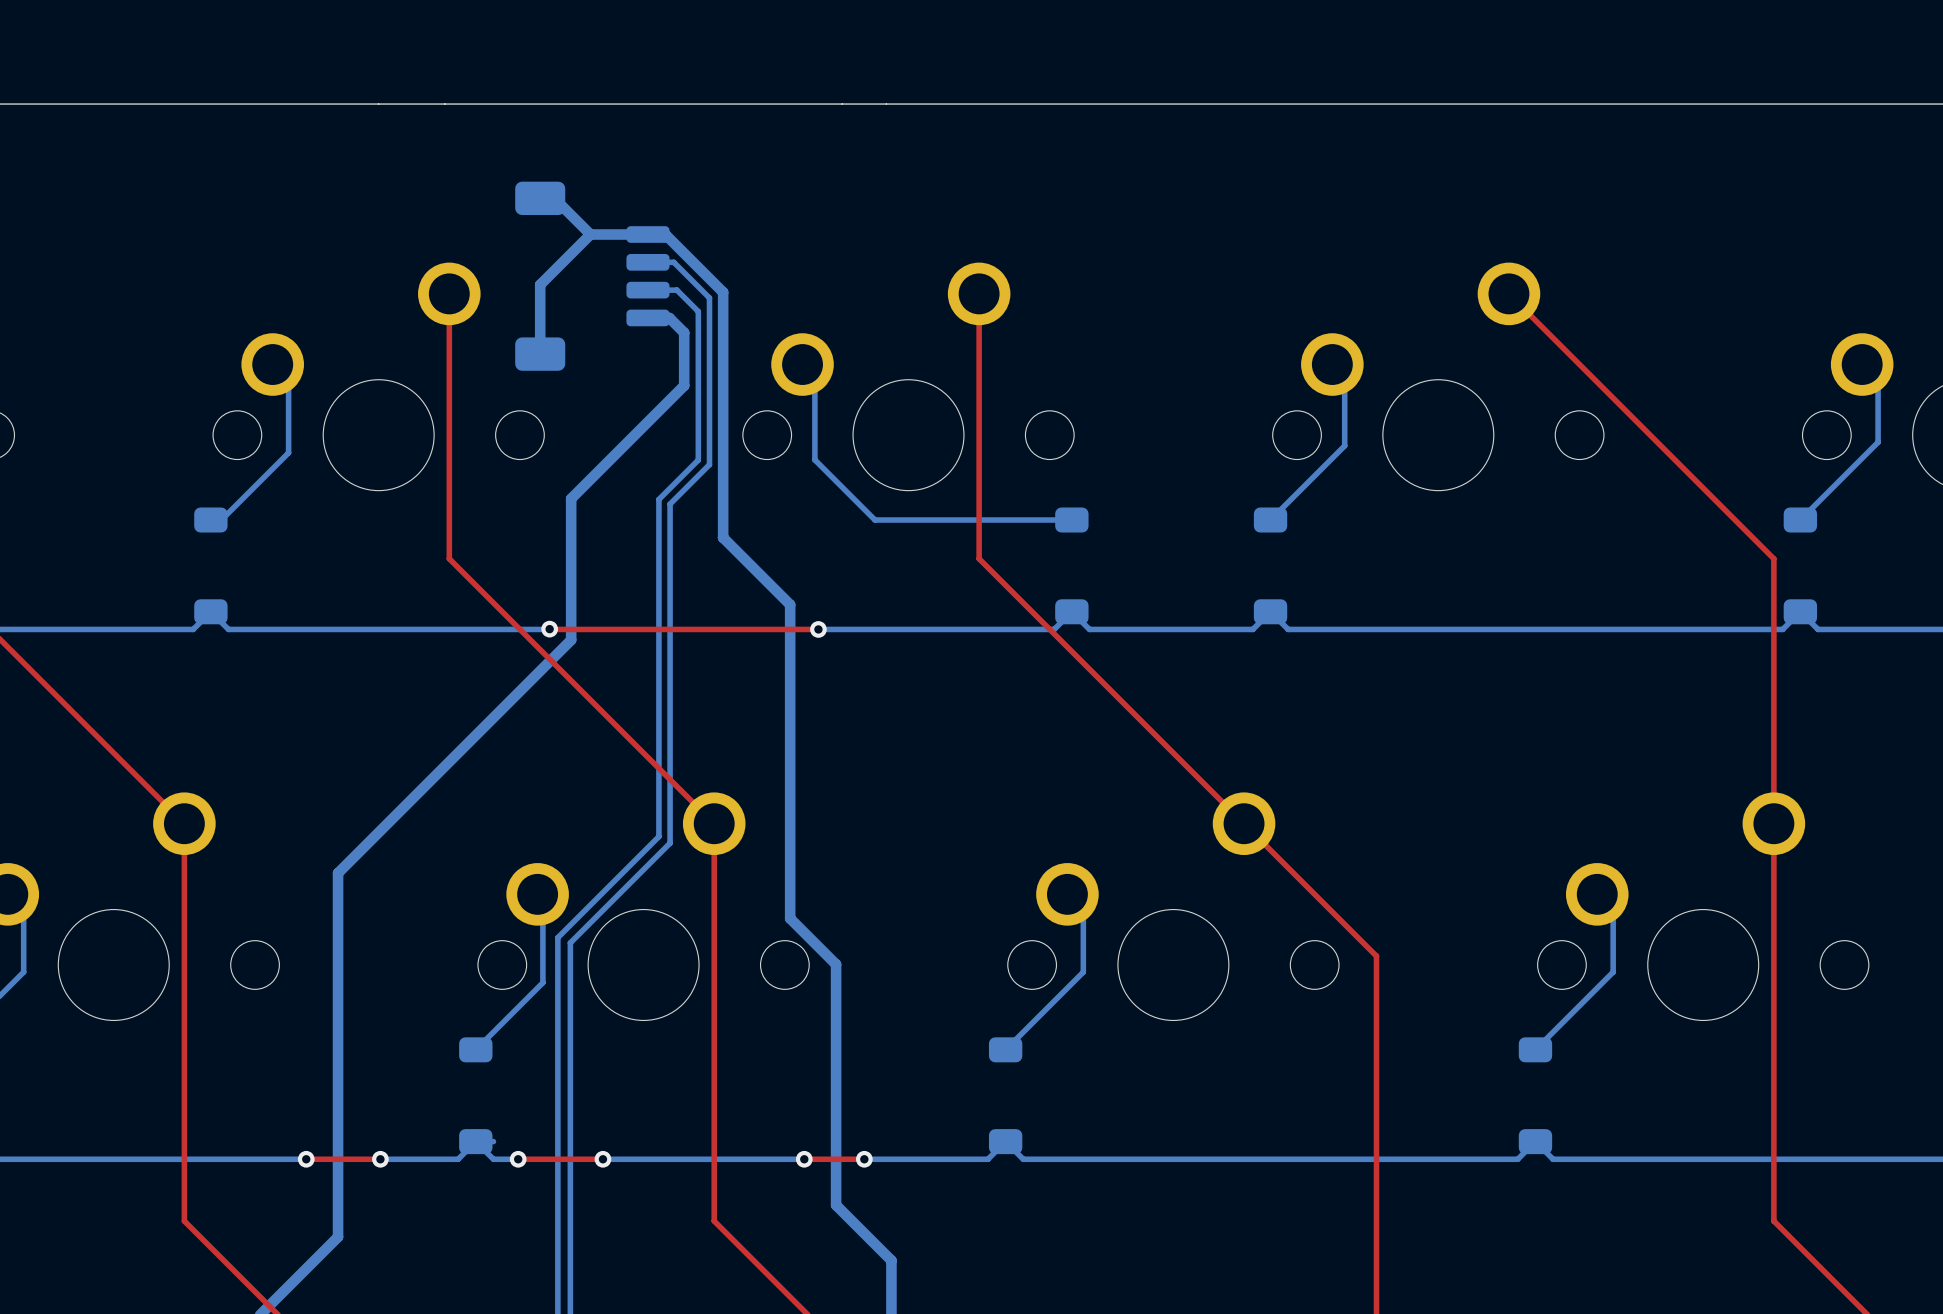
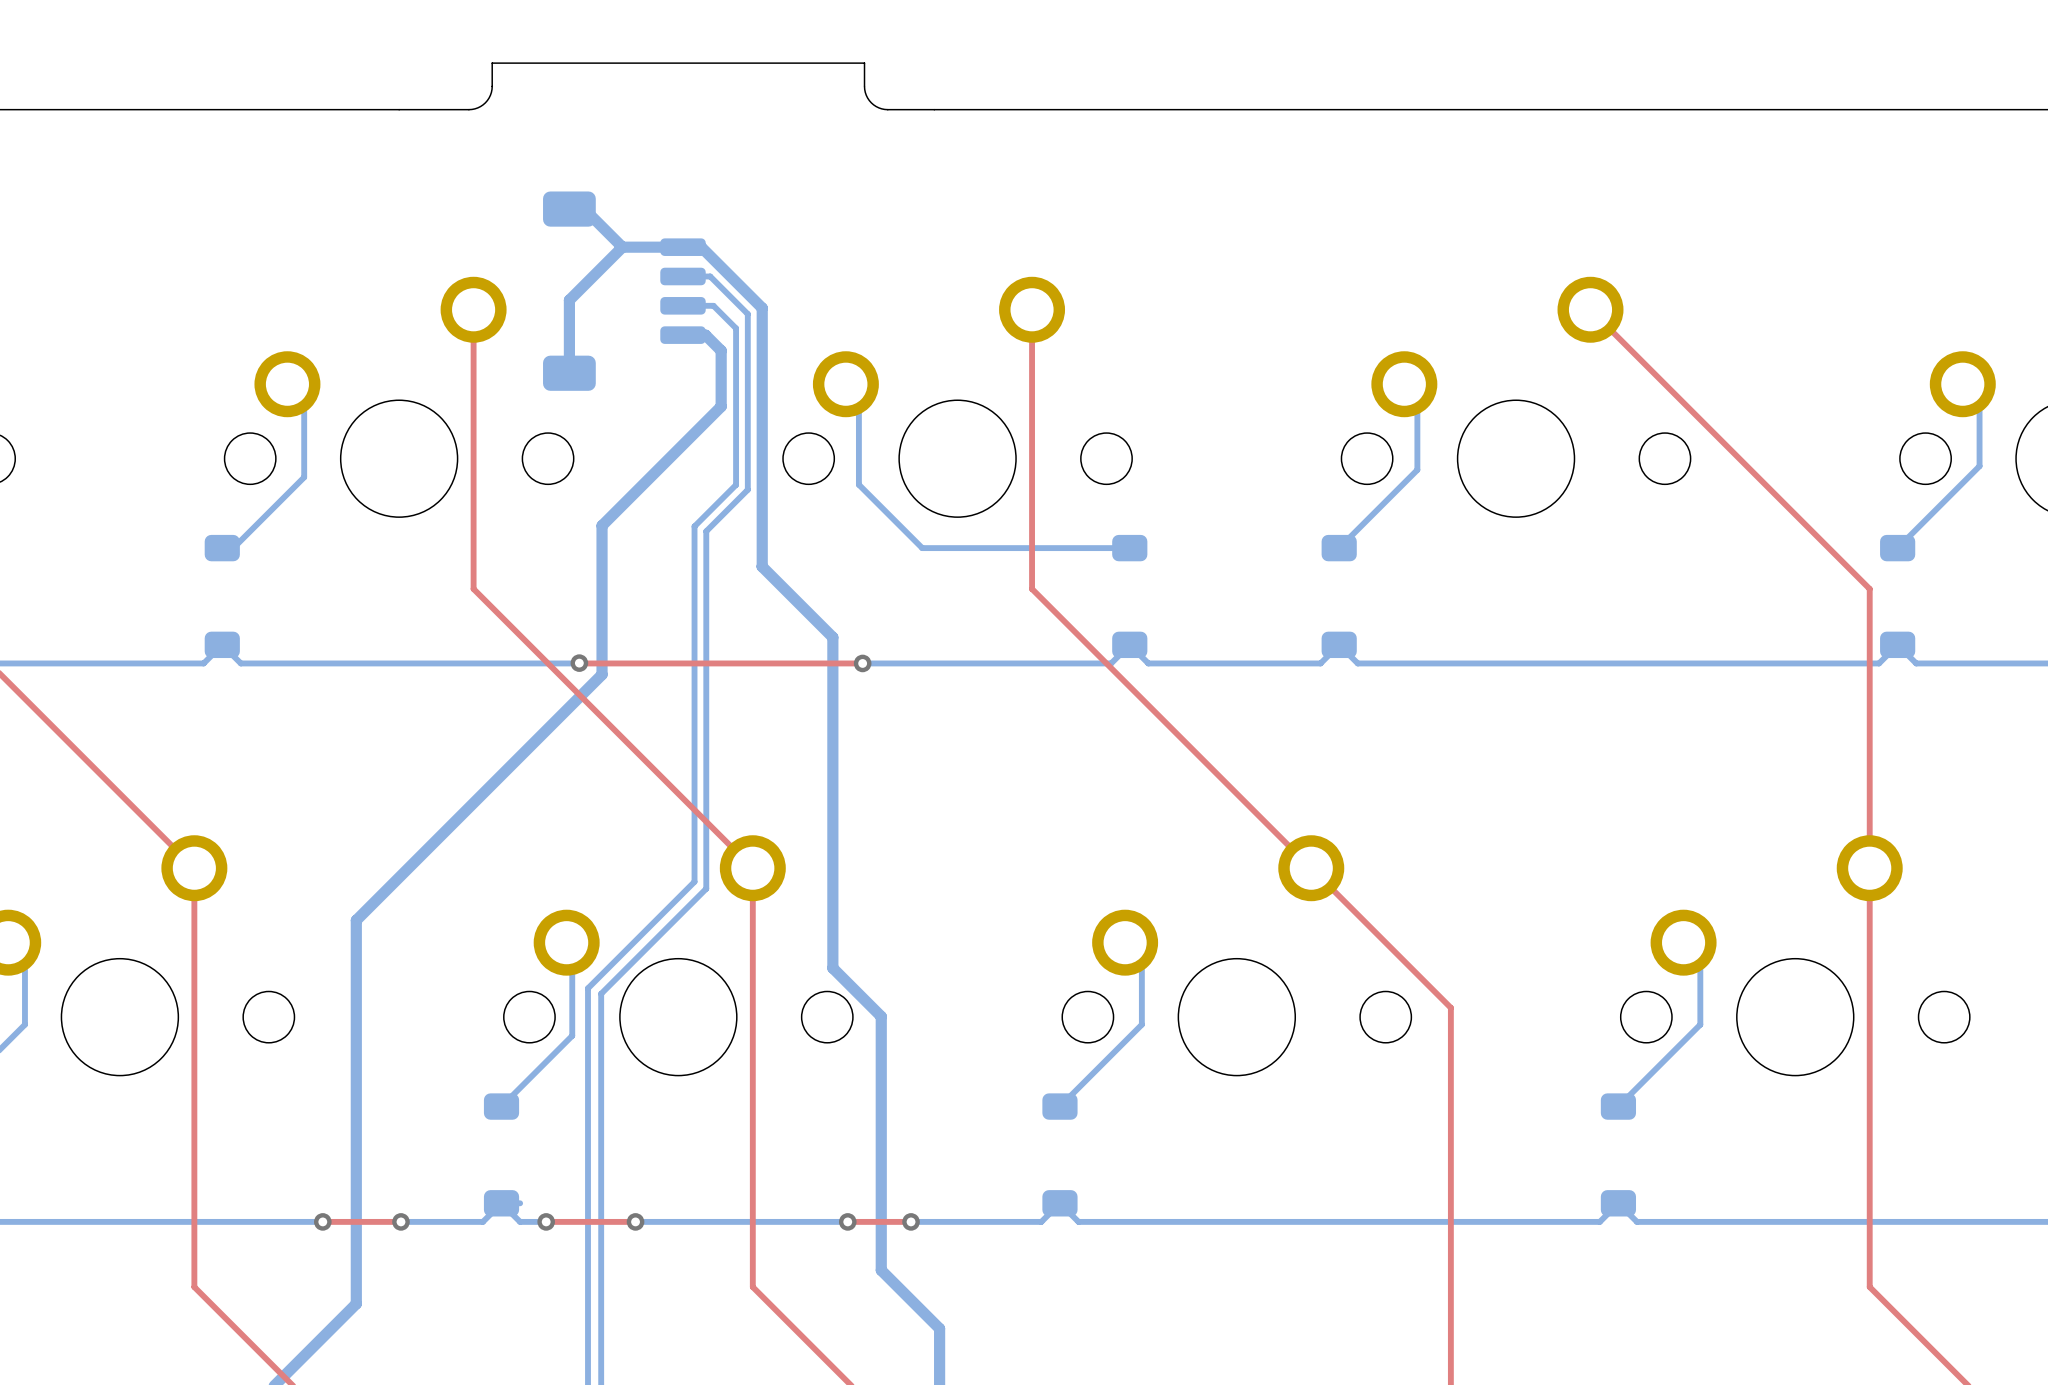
board edge: none -> (864, 86) (866, 95) (871, 102) (878, 107) (887, 109)
board edge: (444, 104) (842, 104) -> (468, 109) (480, 106) (489, 98) (492, 89) (492, 63) (864, 63) (864, 86)

